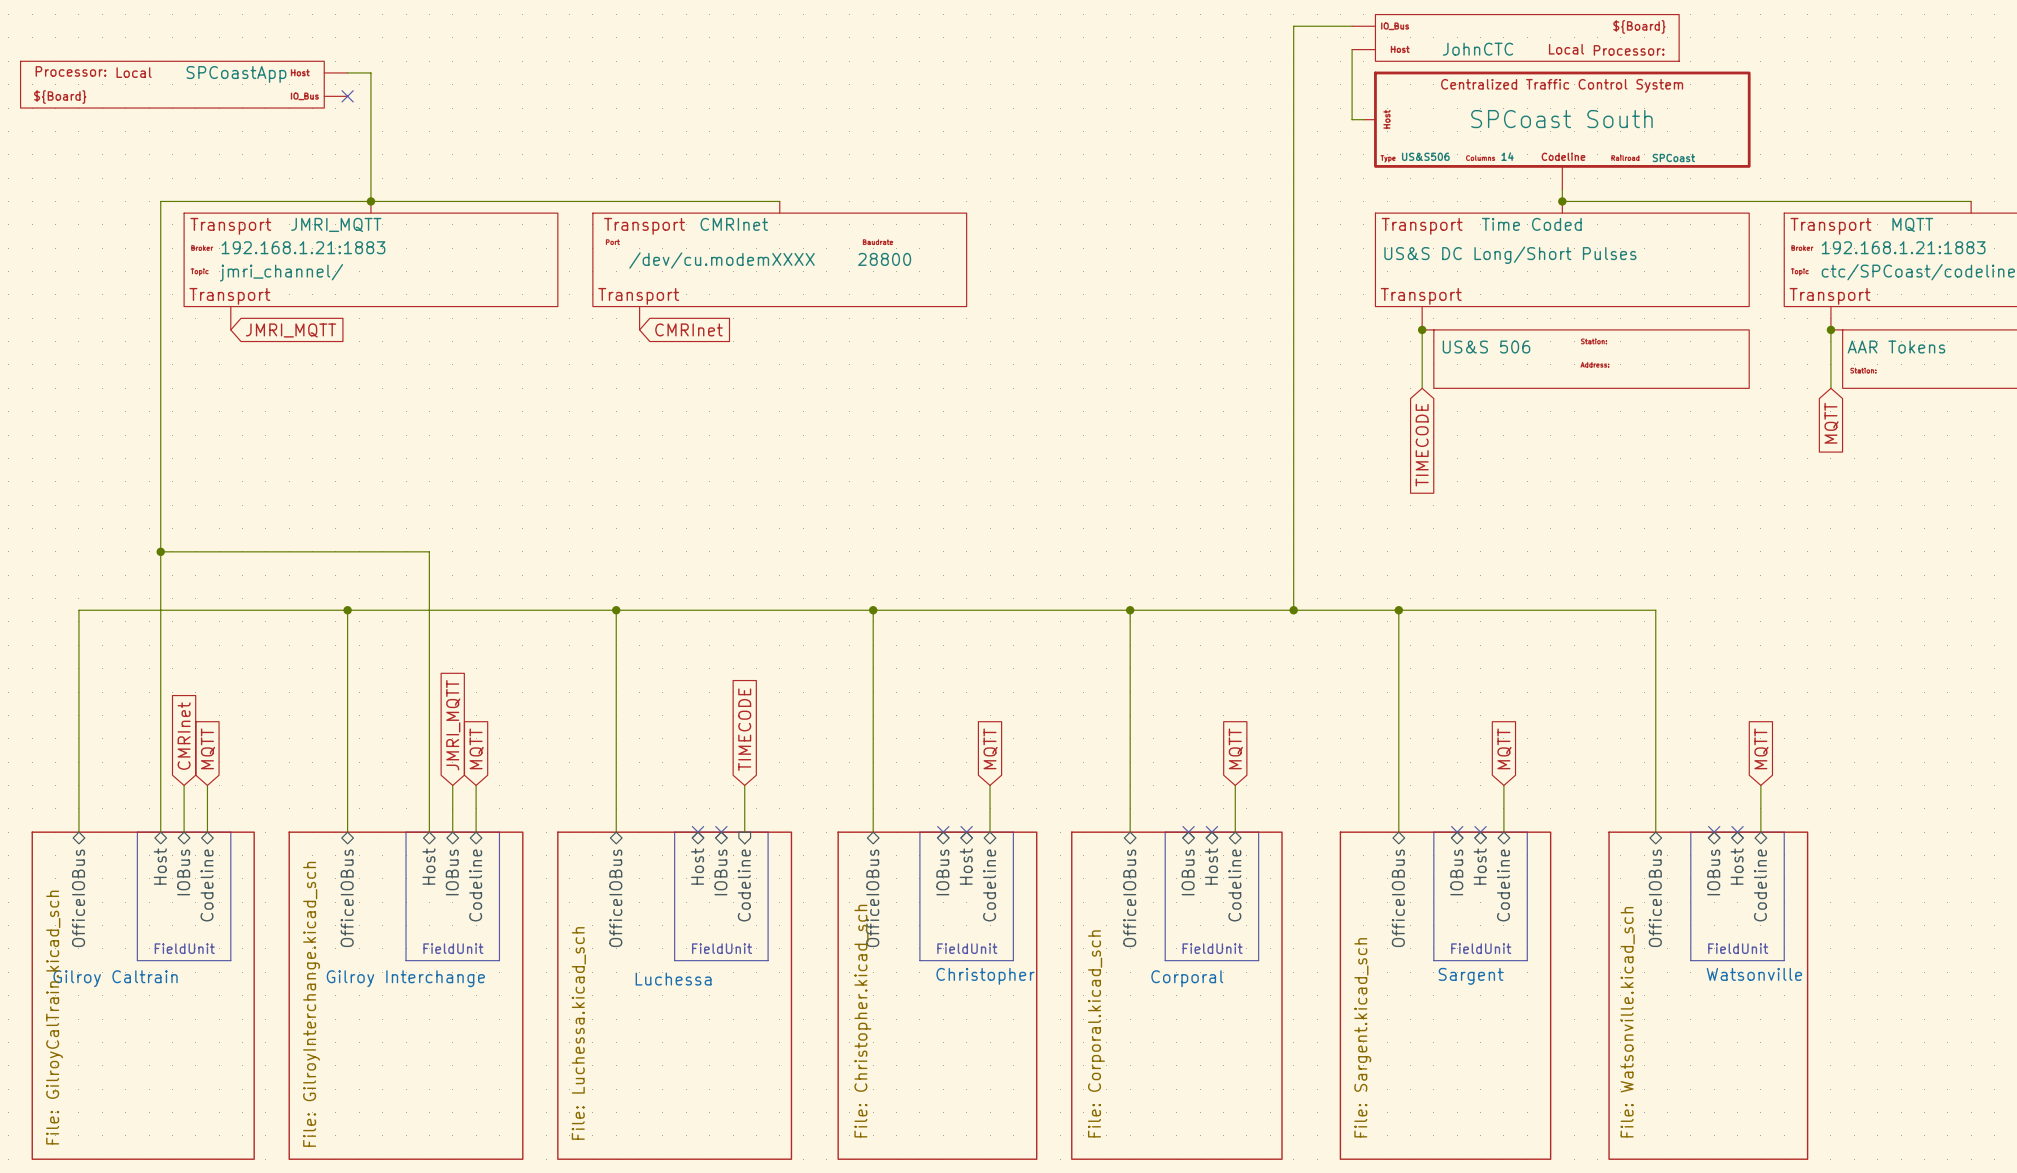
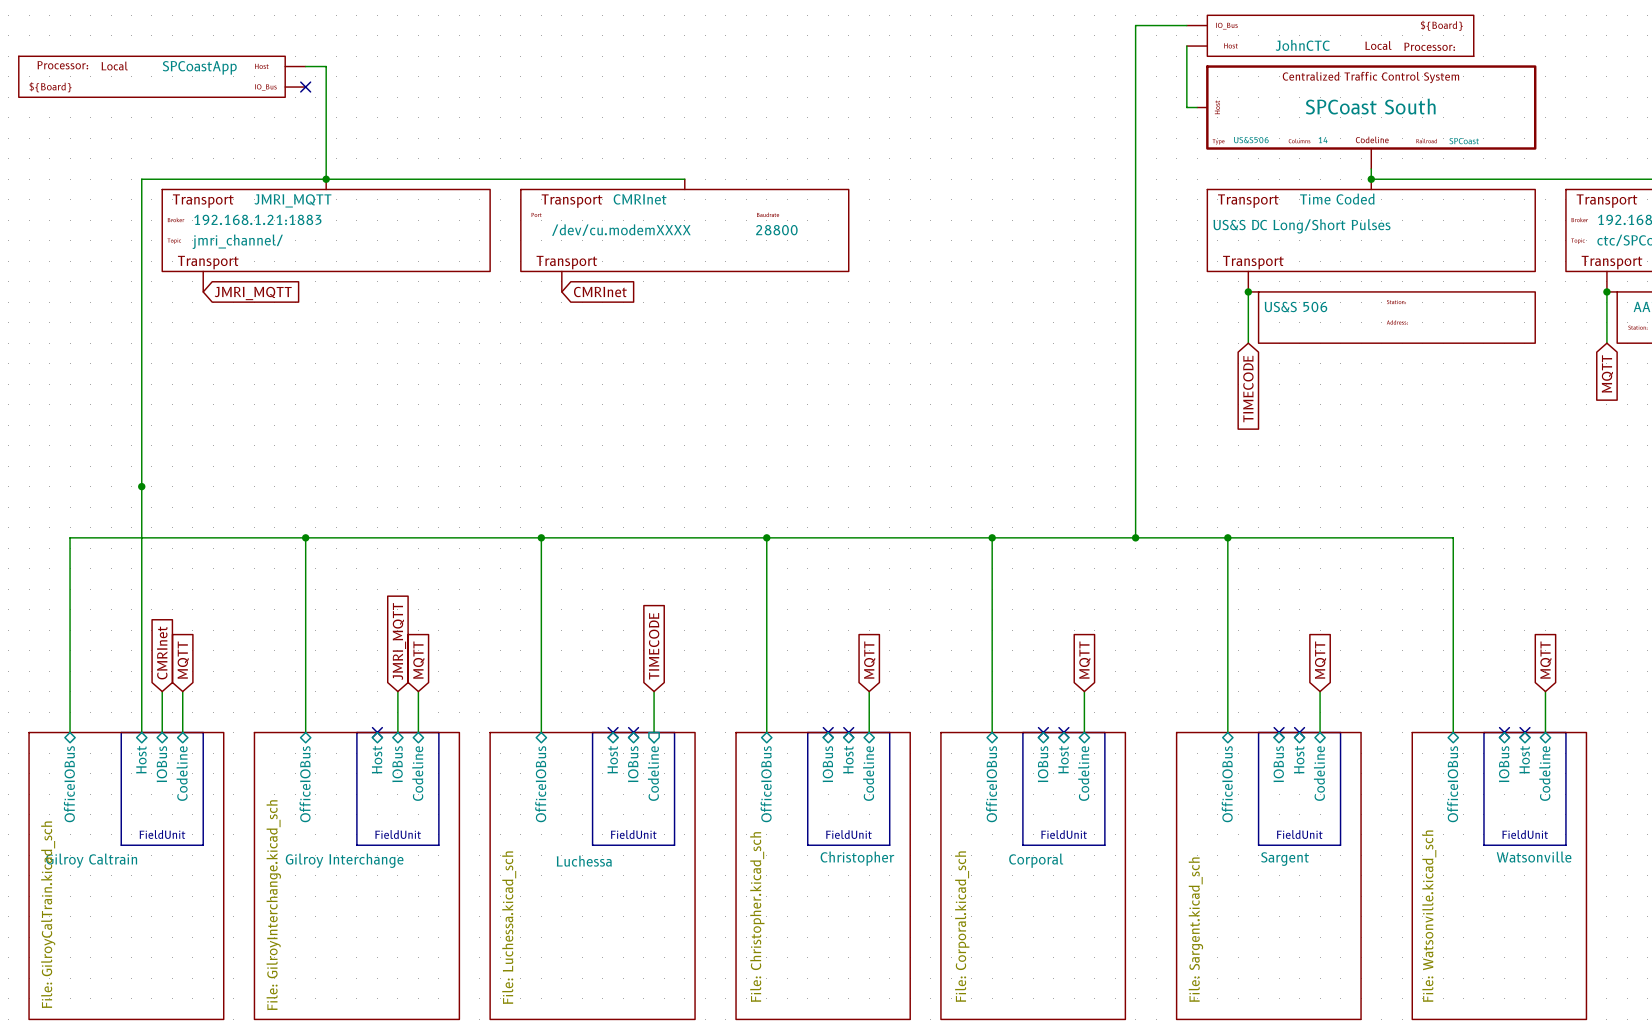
wire: (160, 551) (429, 551) (429, 832) -> none
no-connect mark: none -> (377, 732)

